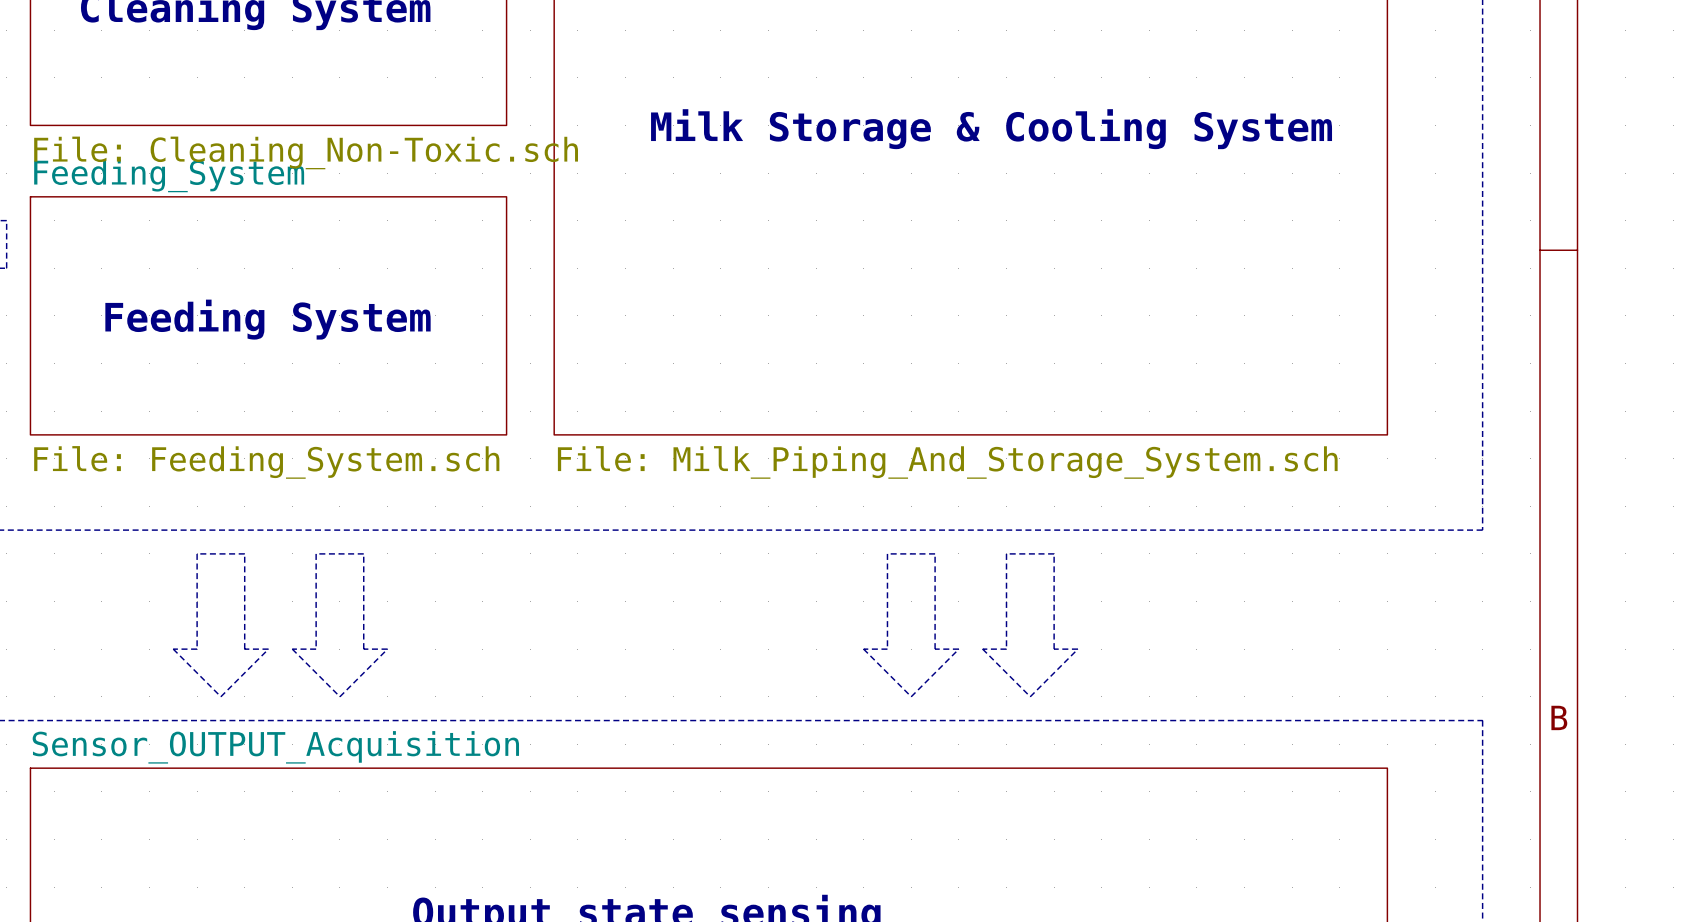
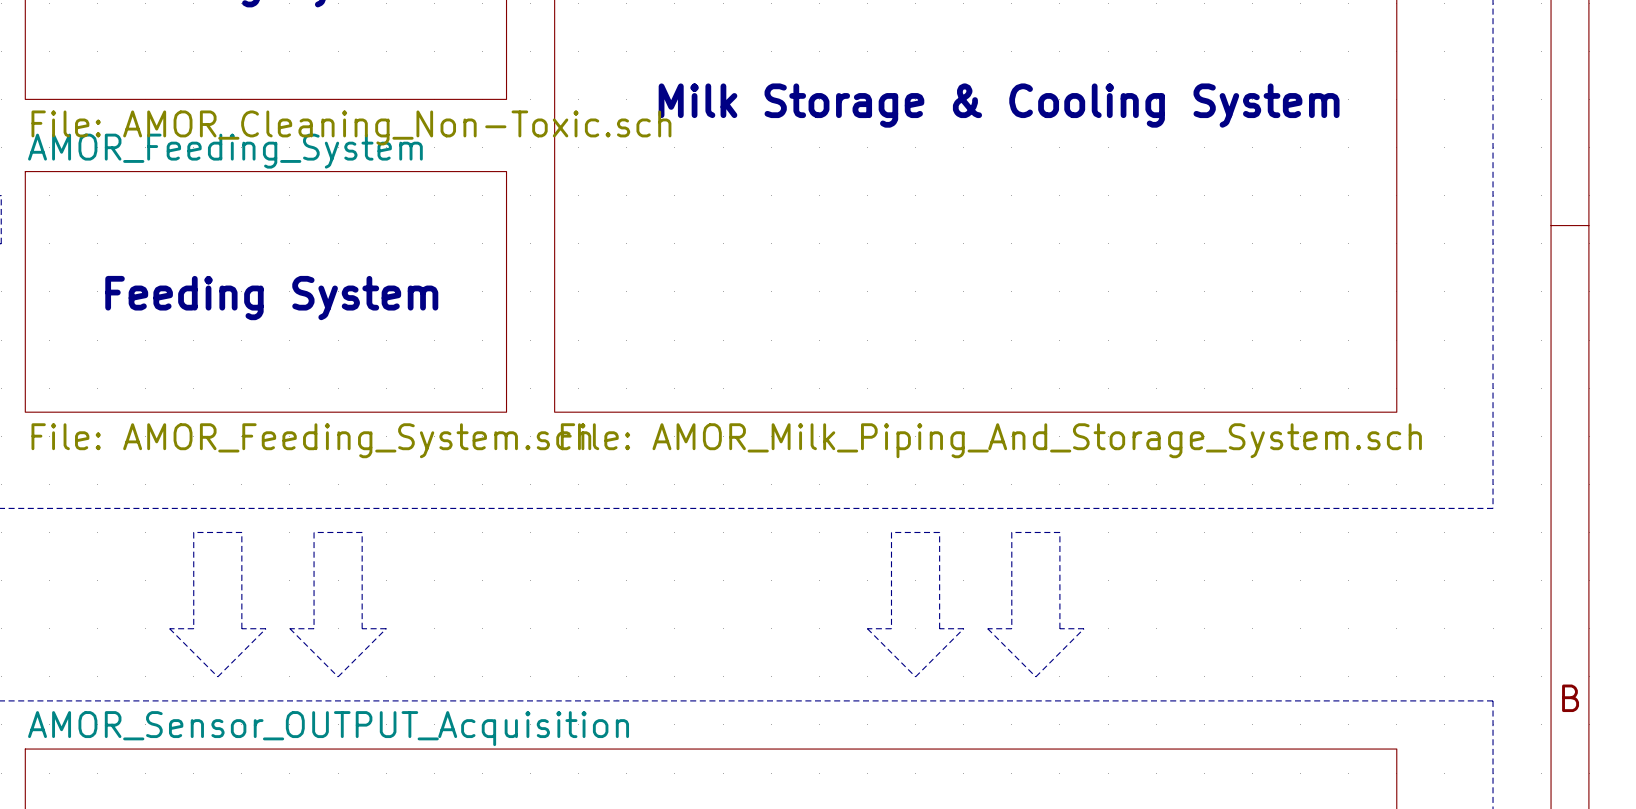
sheet value: File: Cleaning_Non-Toxic.sch (306, 152) -> File: AMOR_Cleaning_Non-Toxic.sch (351, 127)
sheet Feeding_System name: Feeding_System (169, 175) -> AMOR_Feeding_System (225, 151)
sheet Feeding_System value: File: Feeding_System.sch (266, 462) -> File: AMOR_Feeding_System.sch (311, 440)
sheet value: File: Milk_Piping_And_Storage_System.sch (947, 462) -> File: AMOR_Milk_Piping_And_Storage_System.sch (991, 440)
sheet Sensor_OUTPUT_Acquisition name: Sensor_OUTPUT_Acquisition (275, 747) -> AMOR_Sensor_OUTPUT_Acquisition (328, 728)

